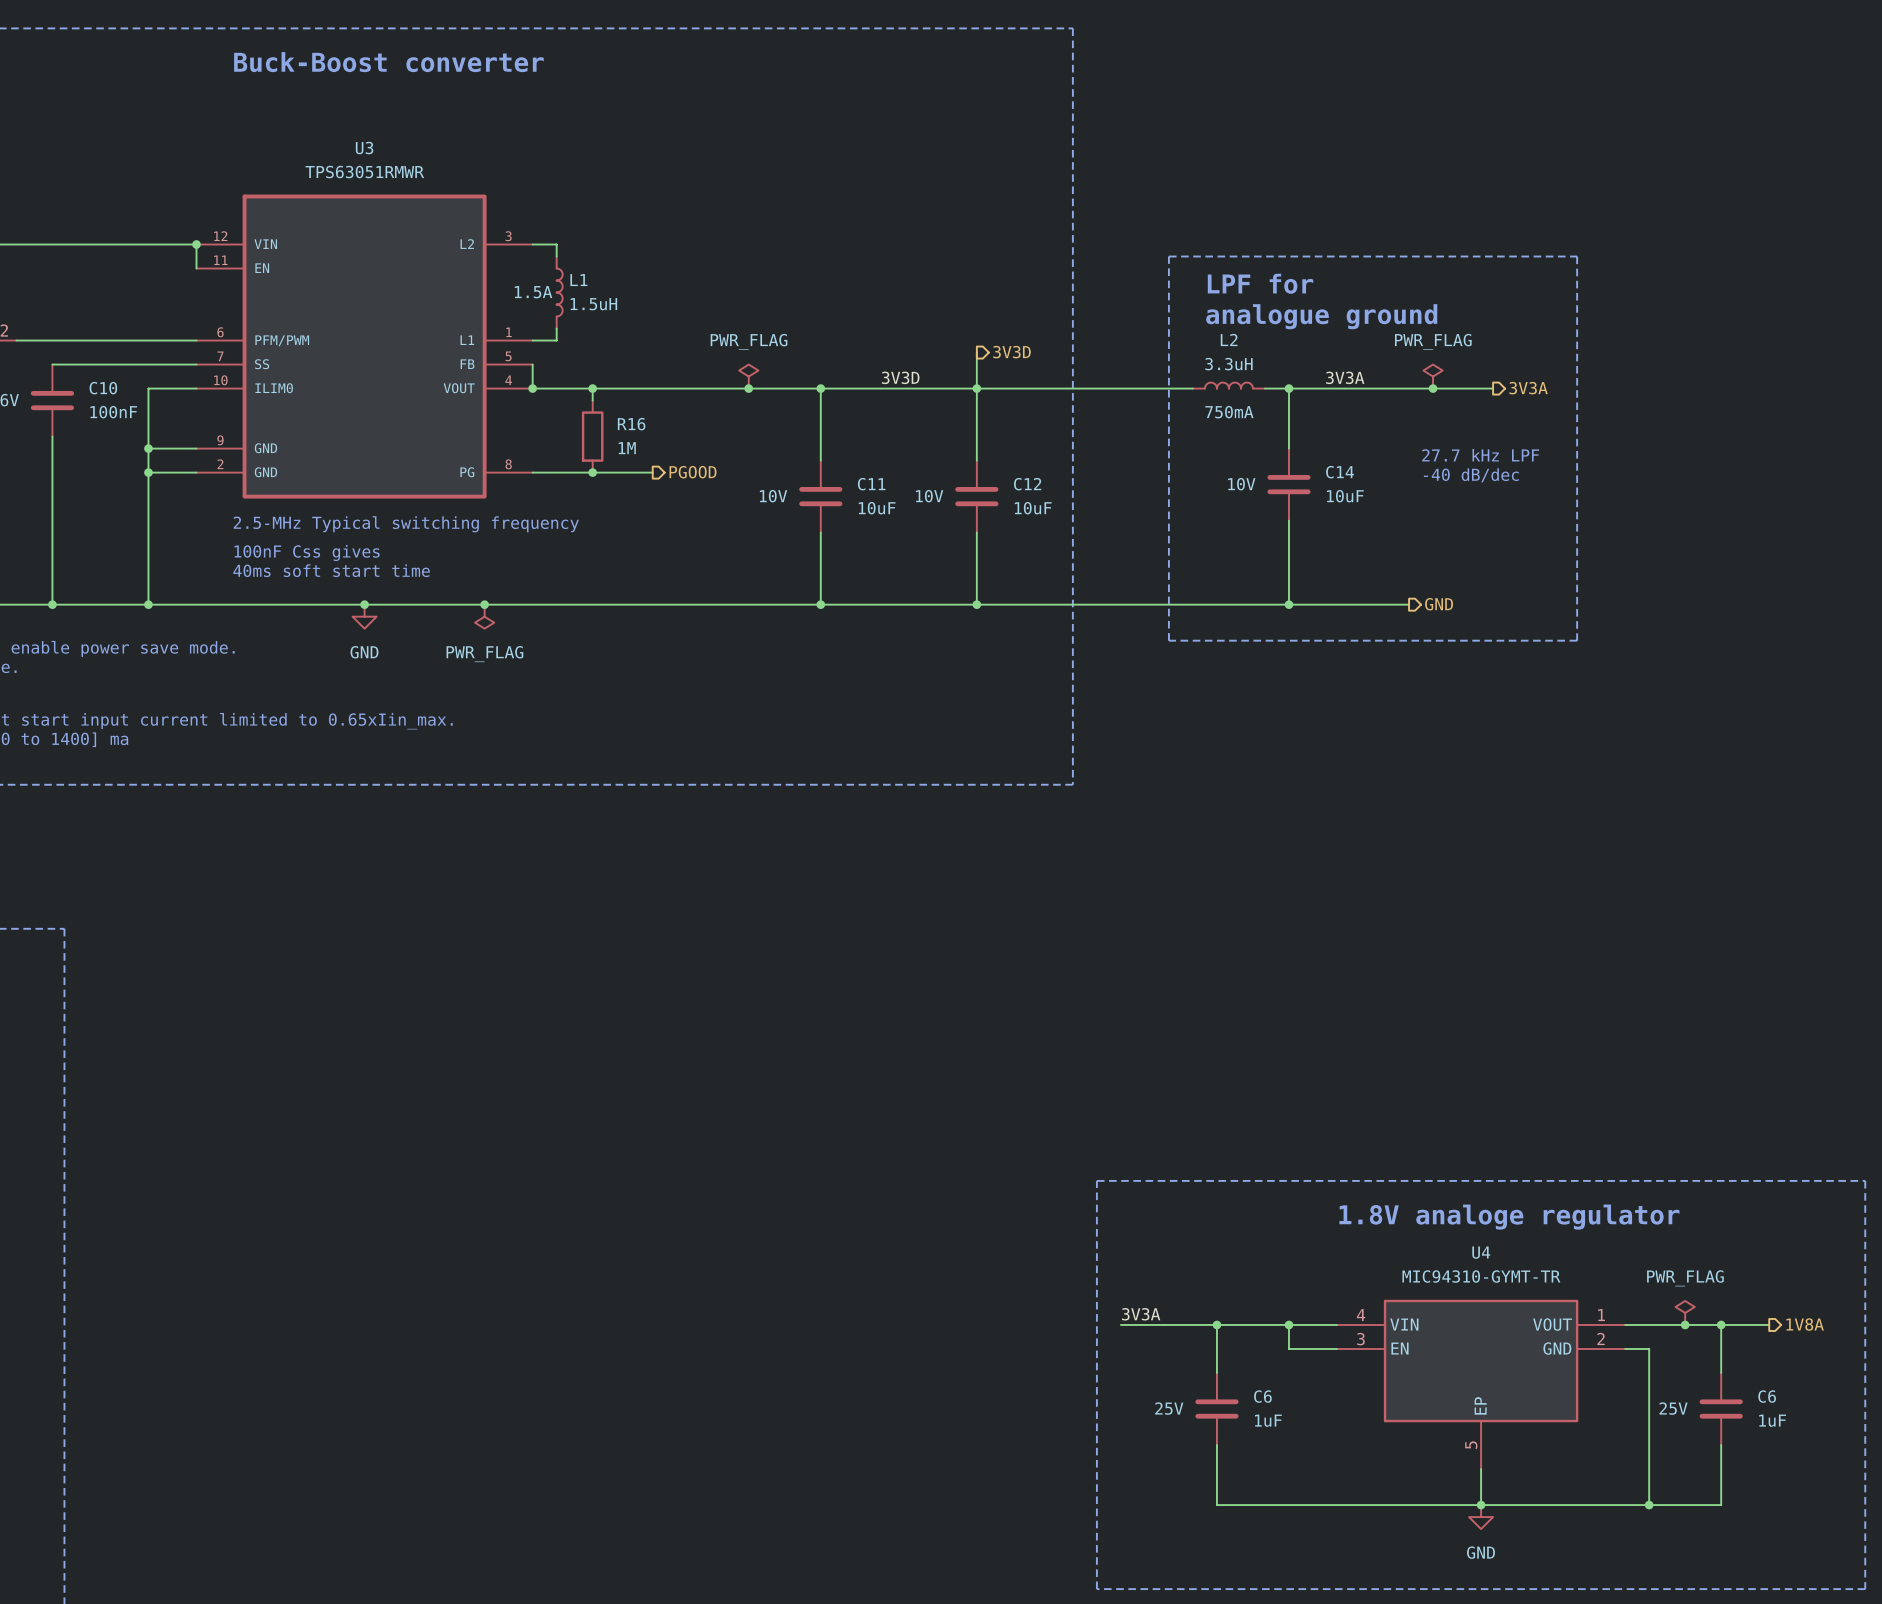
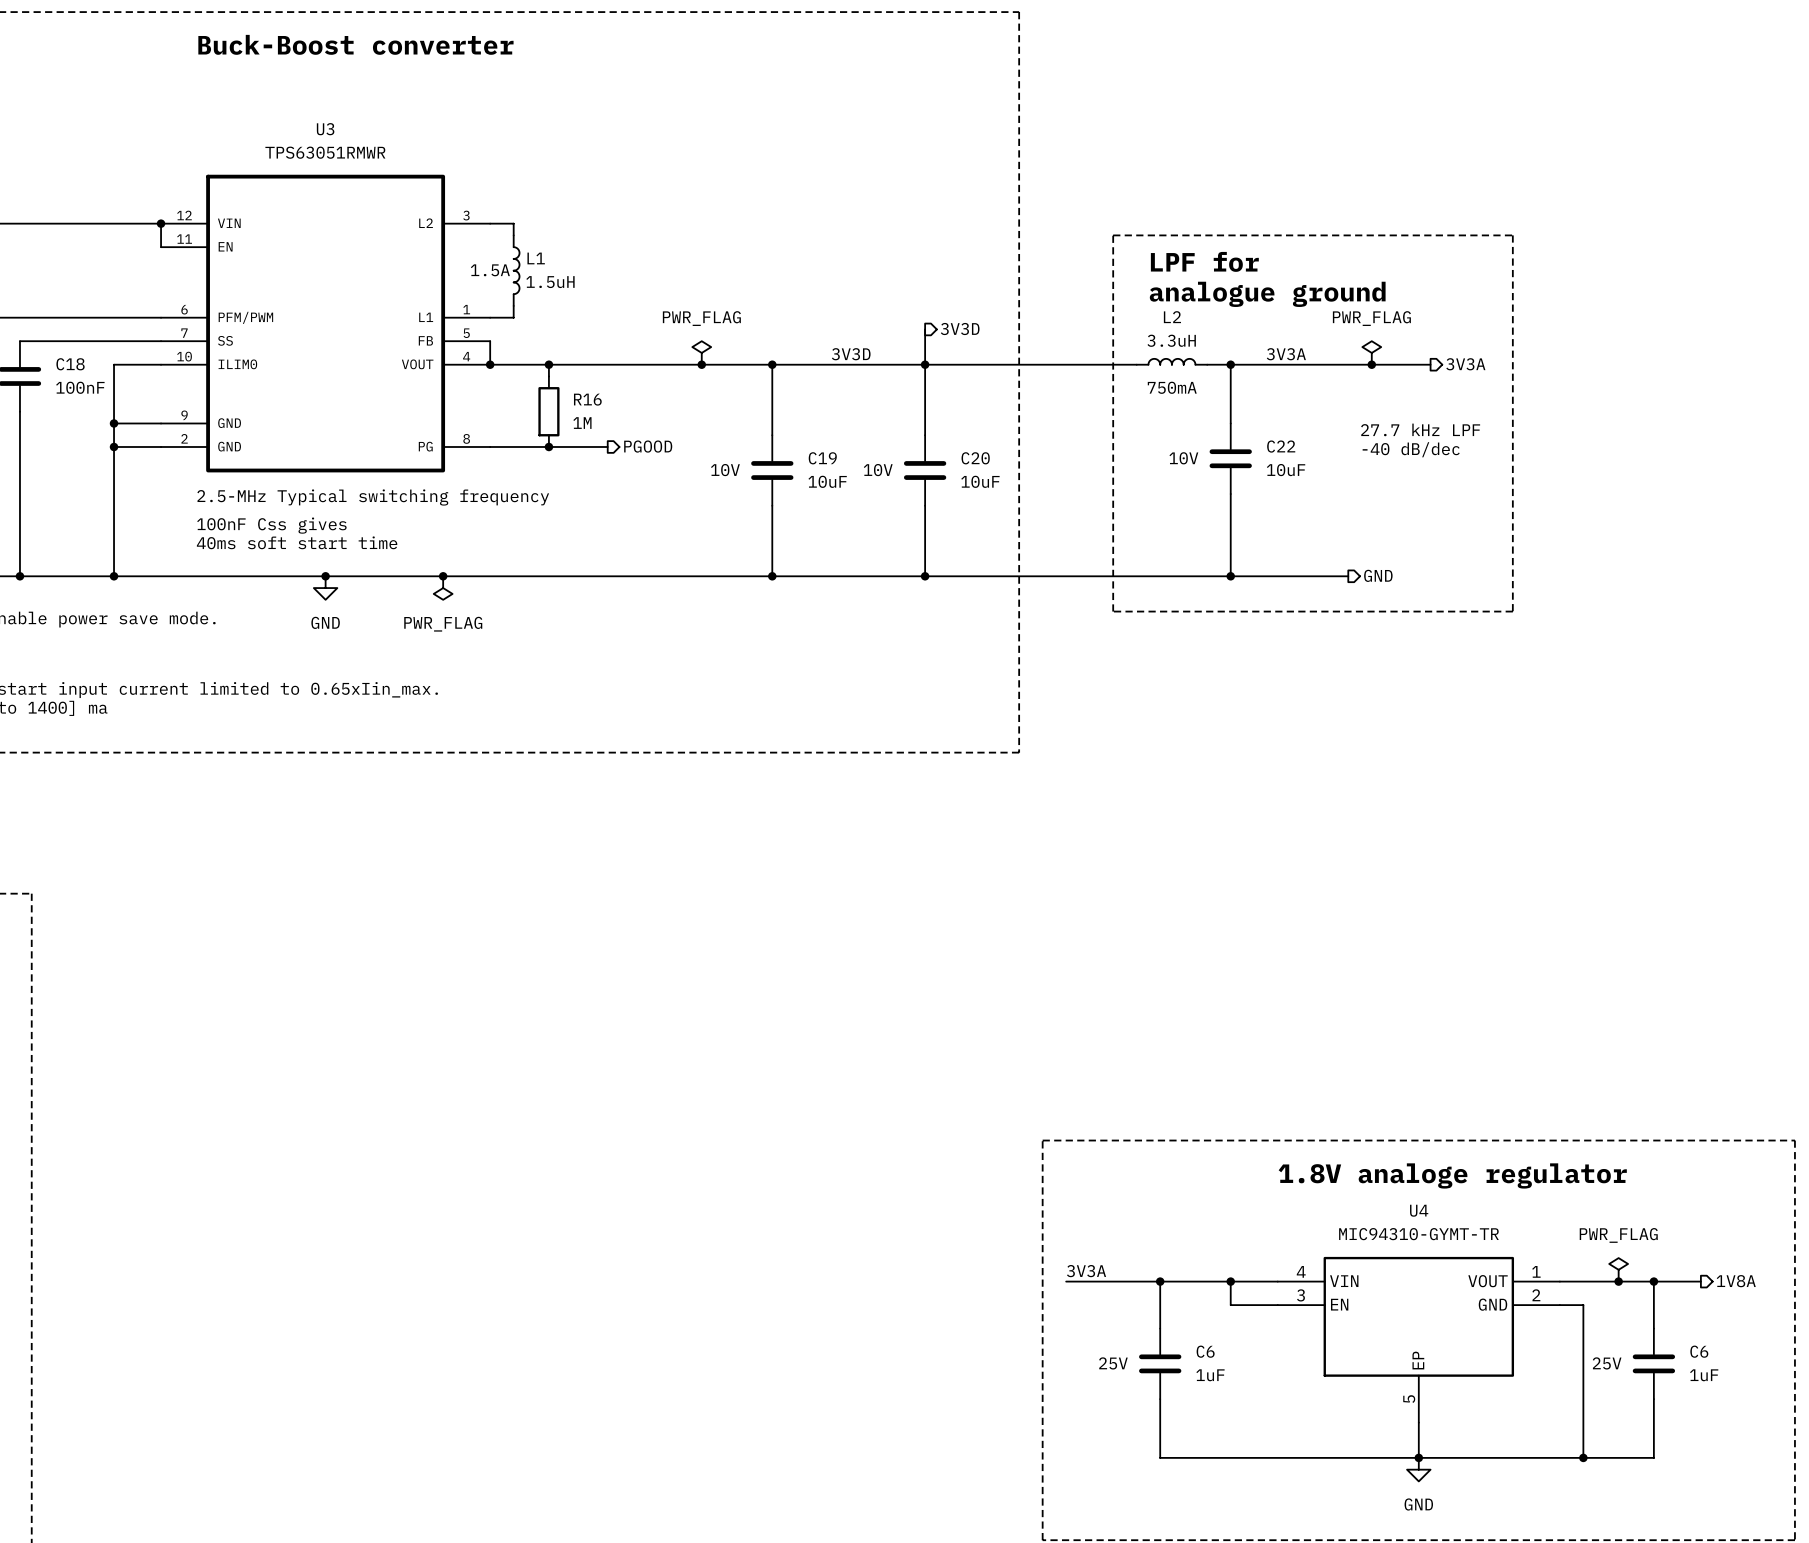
C10 name: C10 (103, 388) -> C18 (70, 364)
C14 name: C14 (1340, 472) -> C22 (1281, 446)
C11 name: C11 (871, 484) -> C19 (822, 458)
C12 name: C12 (1027, 484) -> C20 (975, 458)

